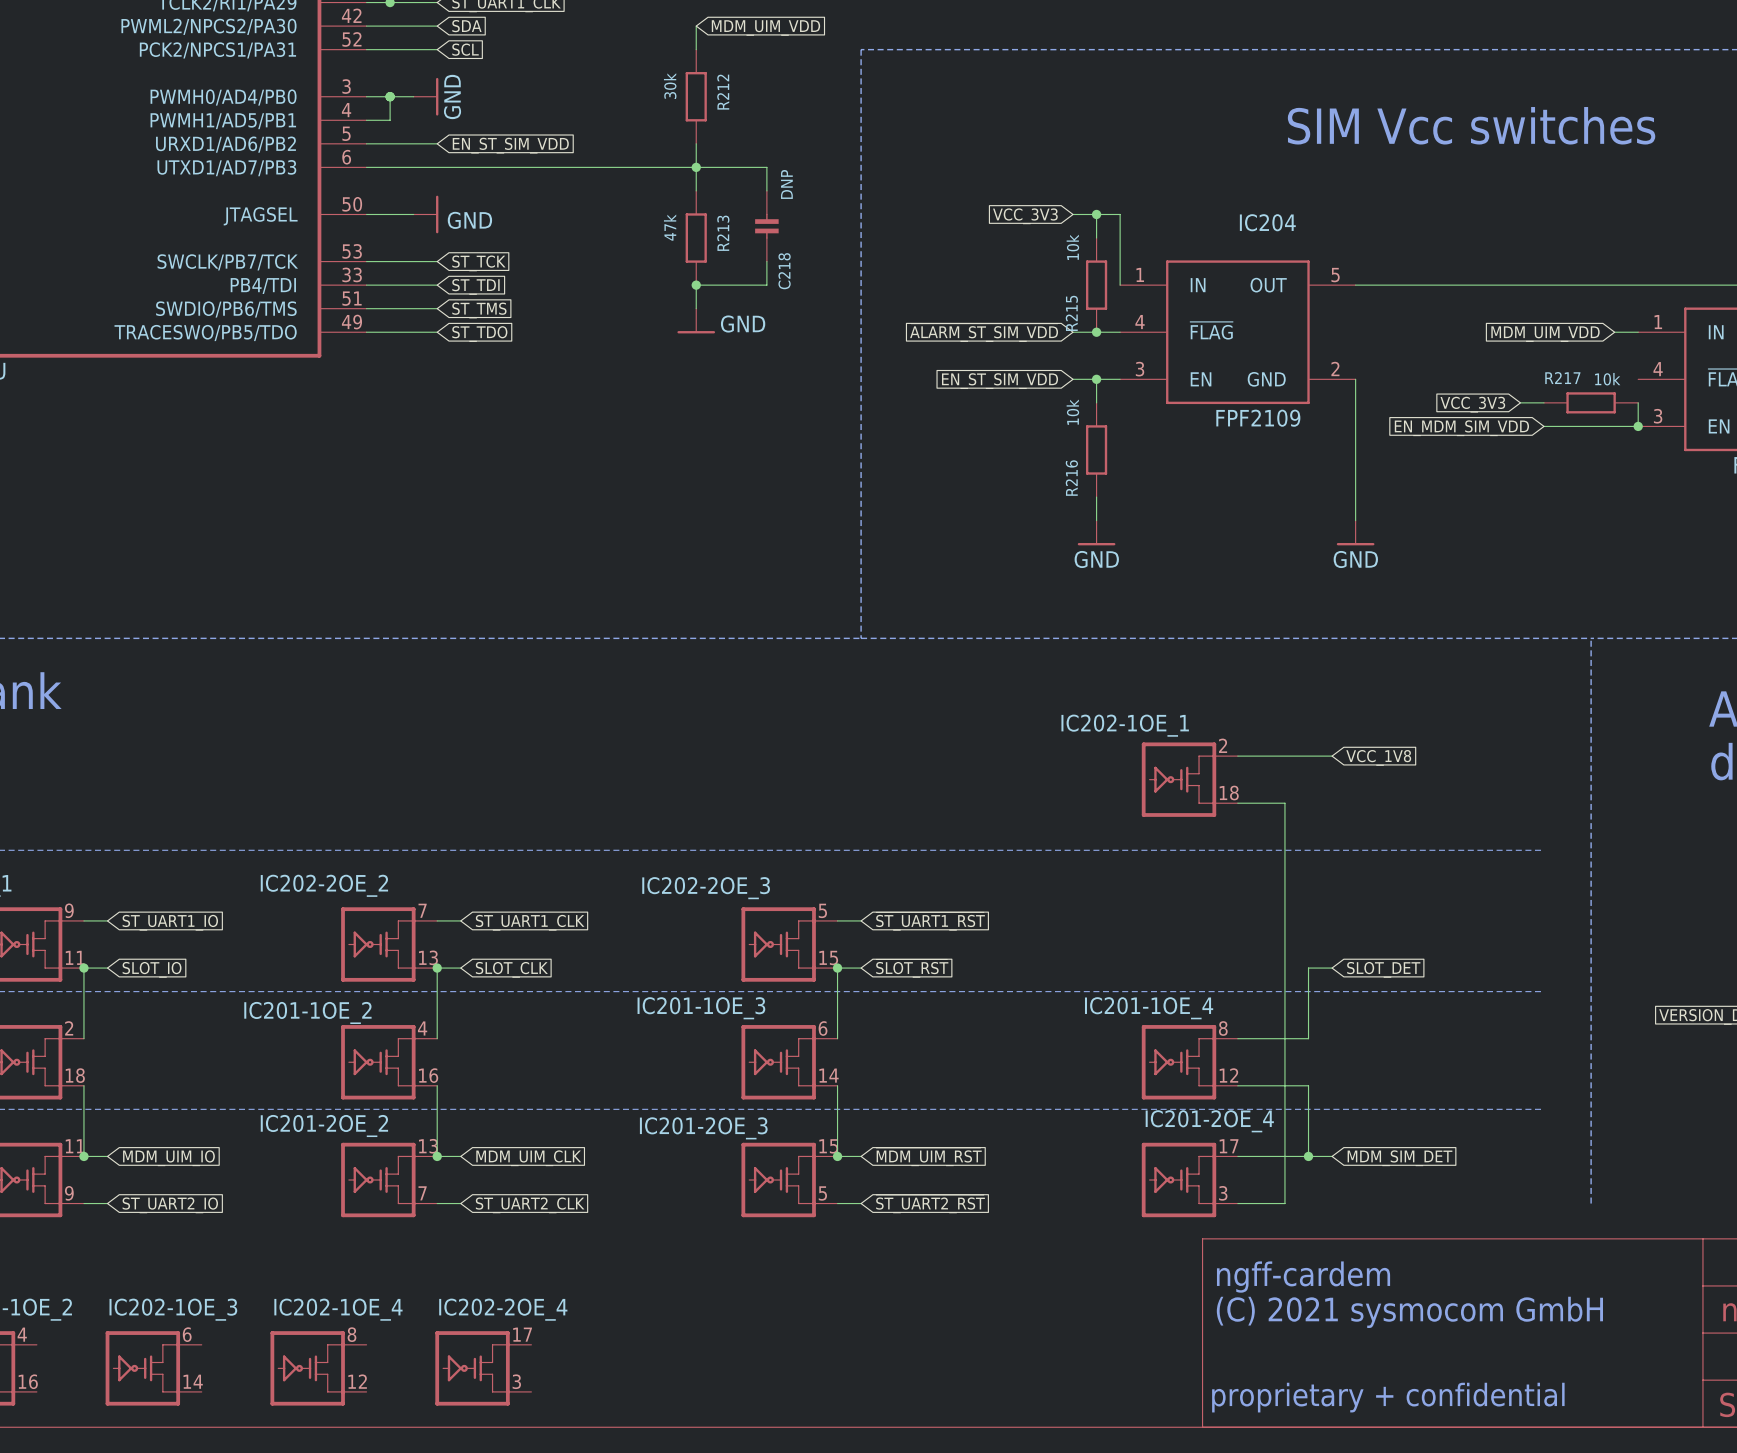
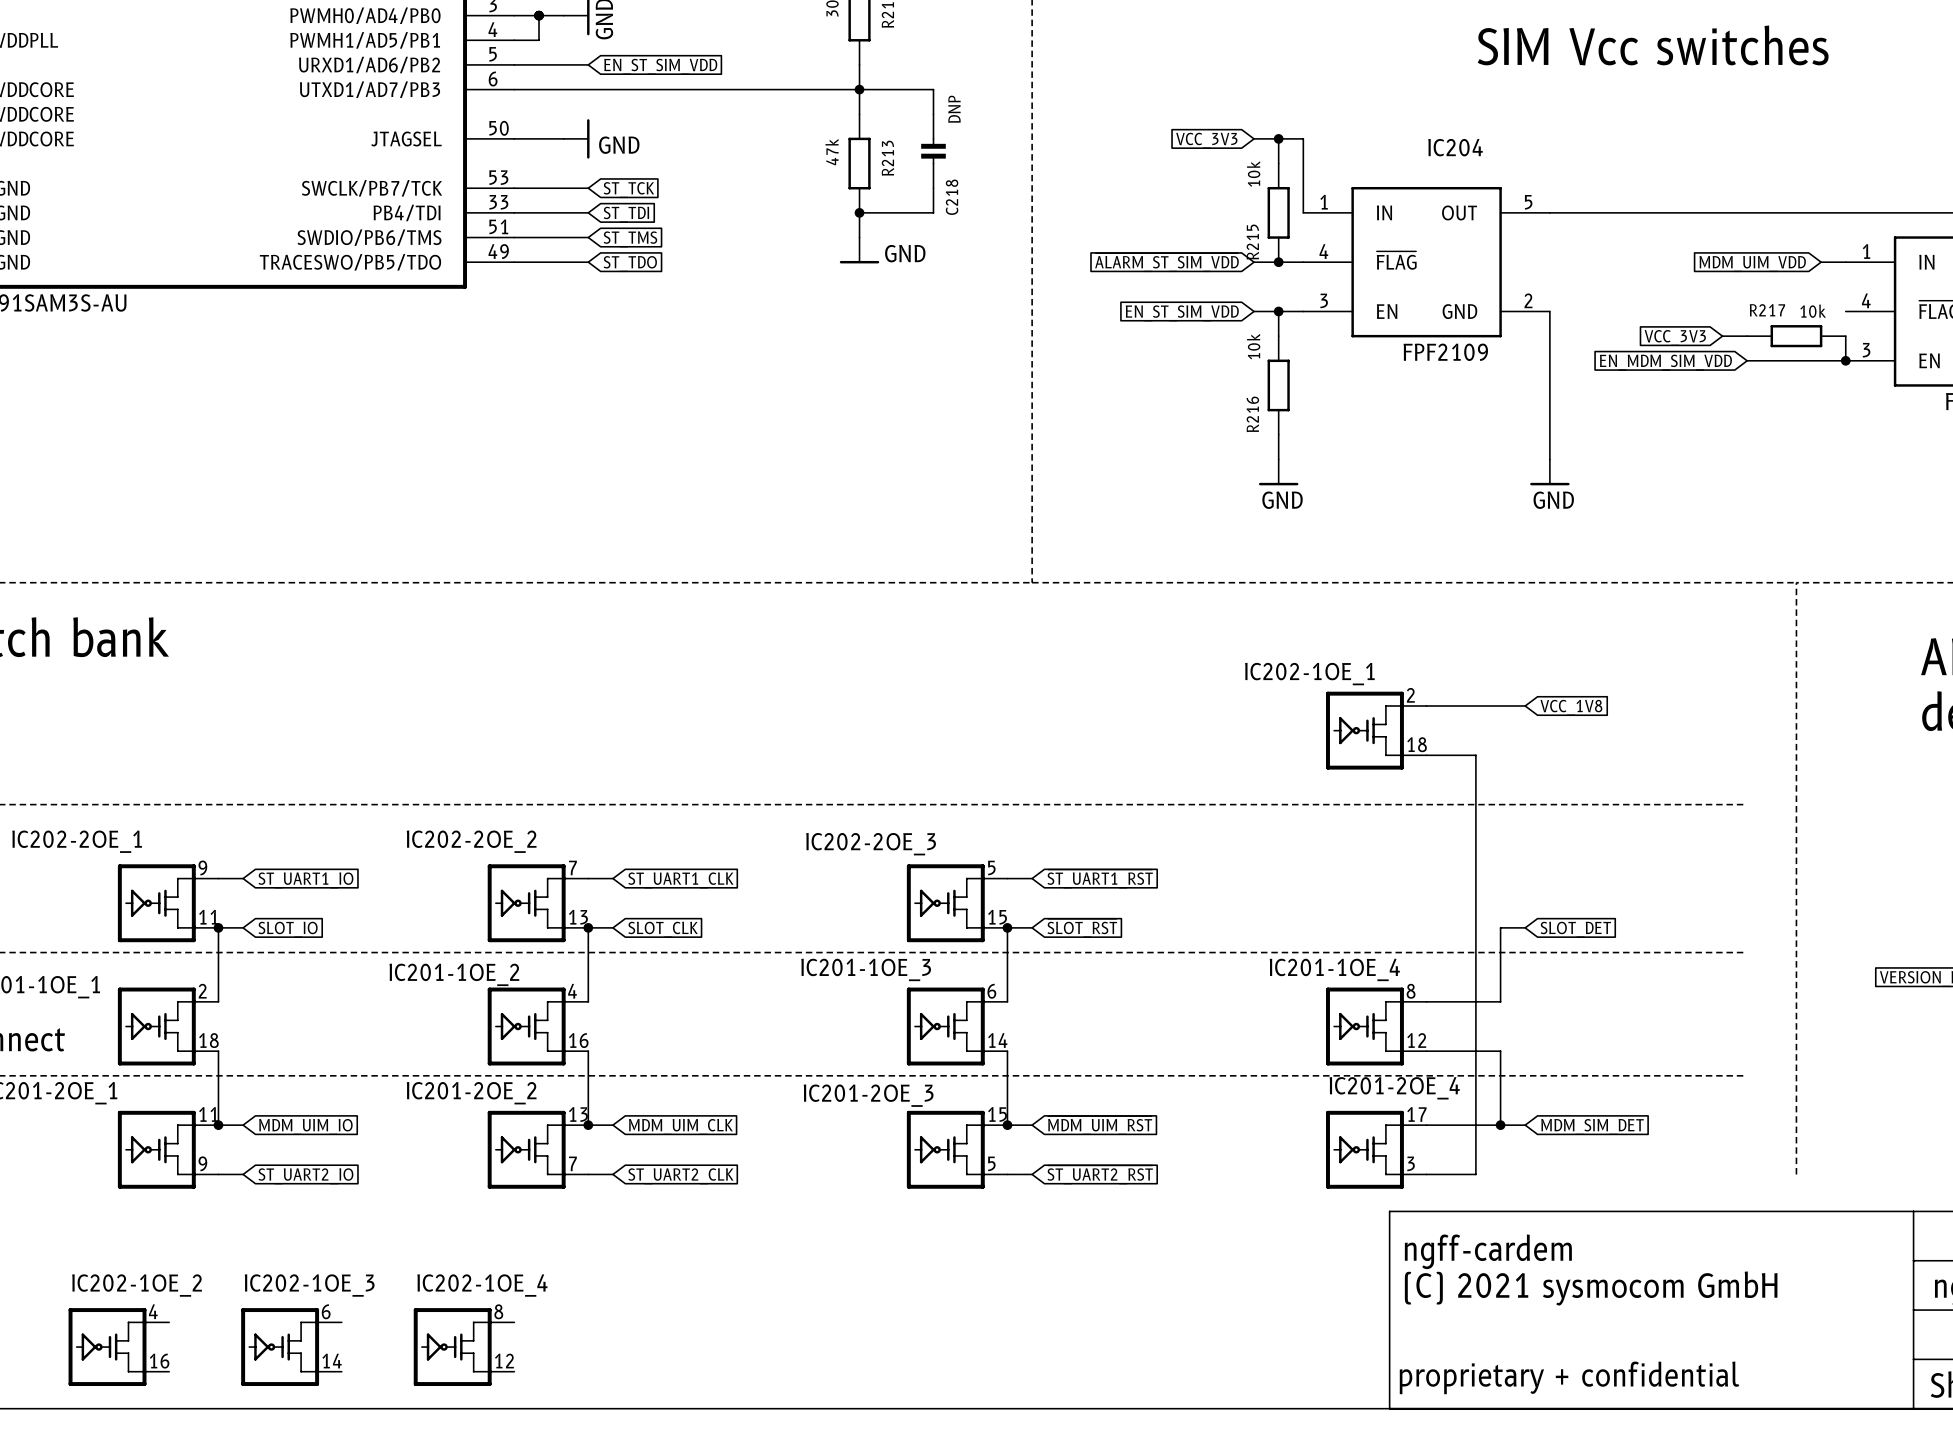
IC202-2OE_4: (483, 1368) -> none

